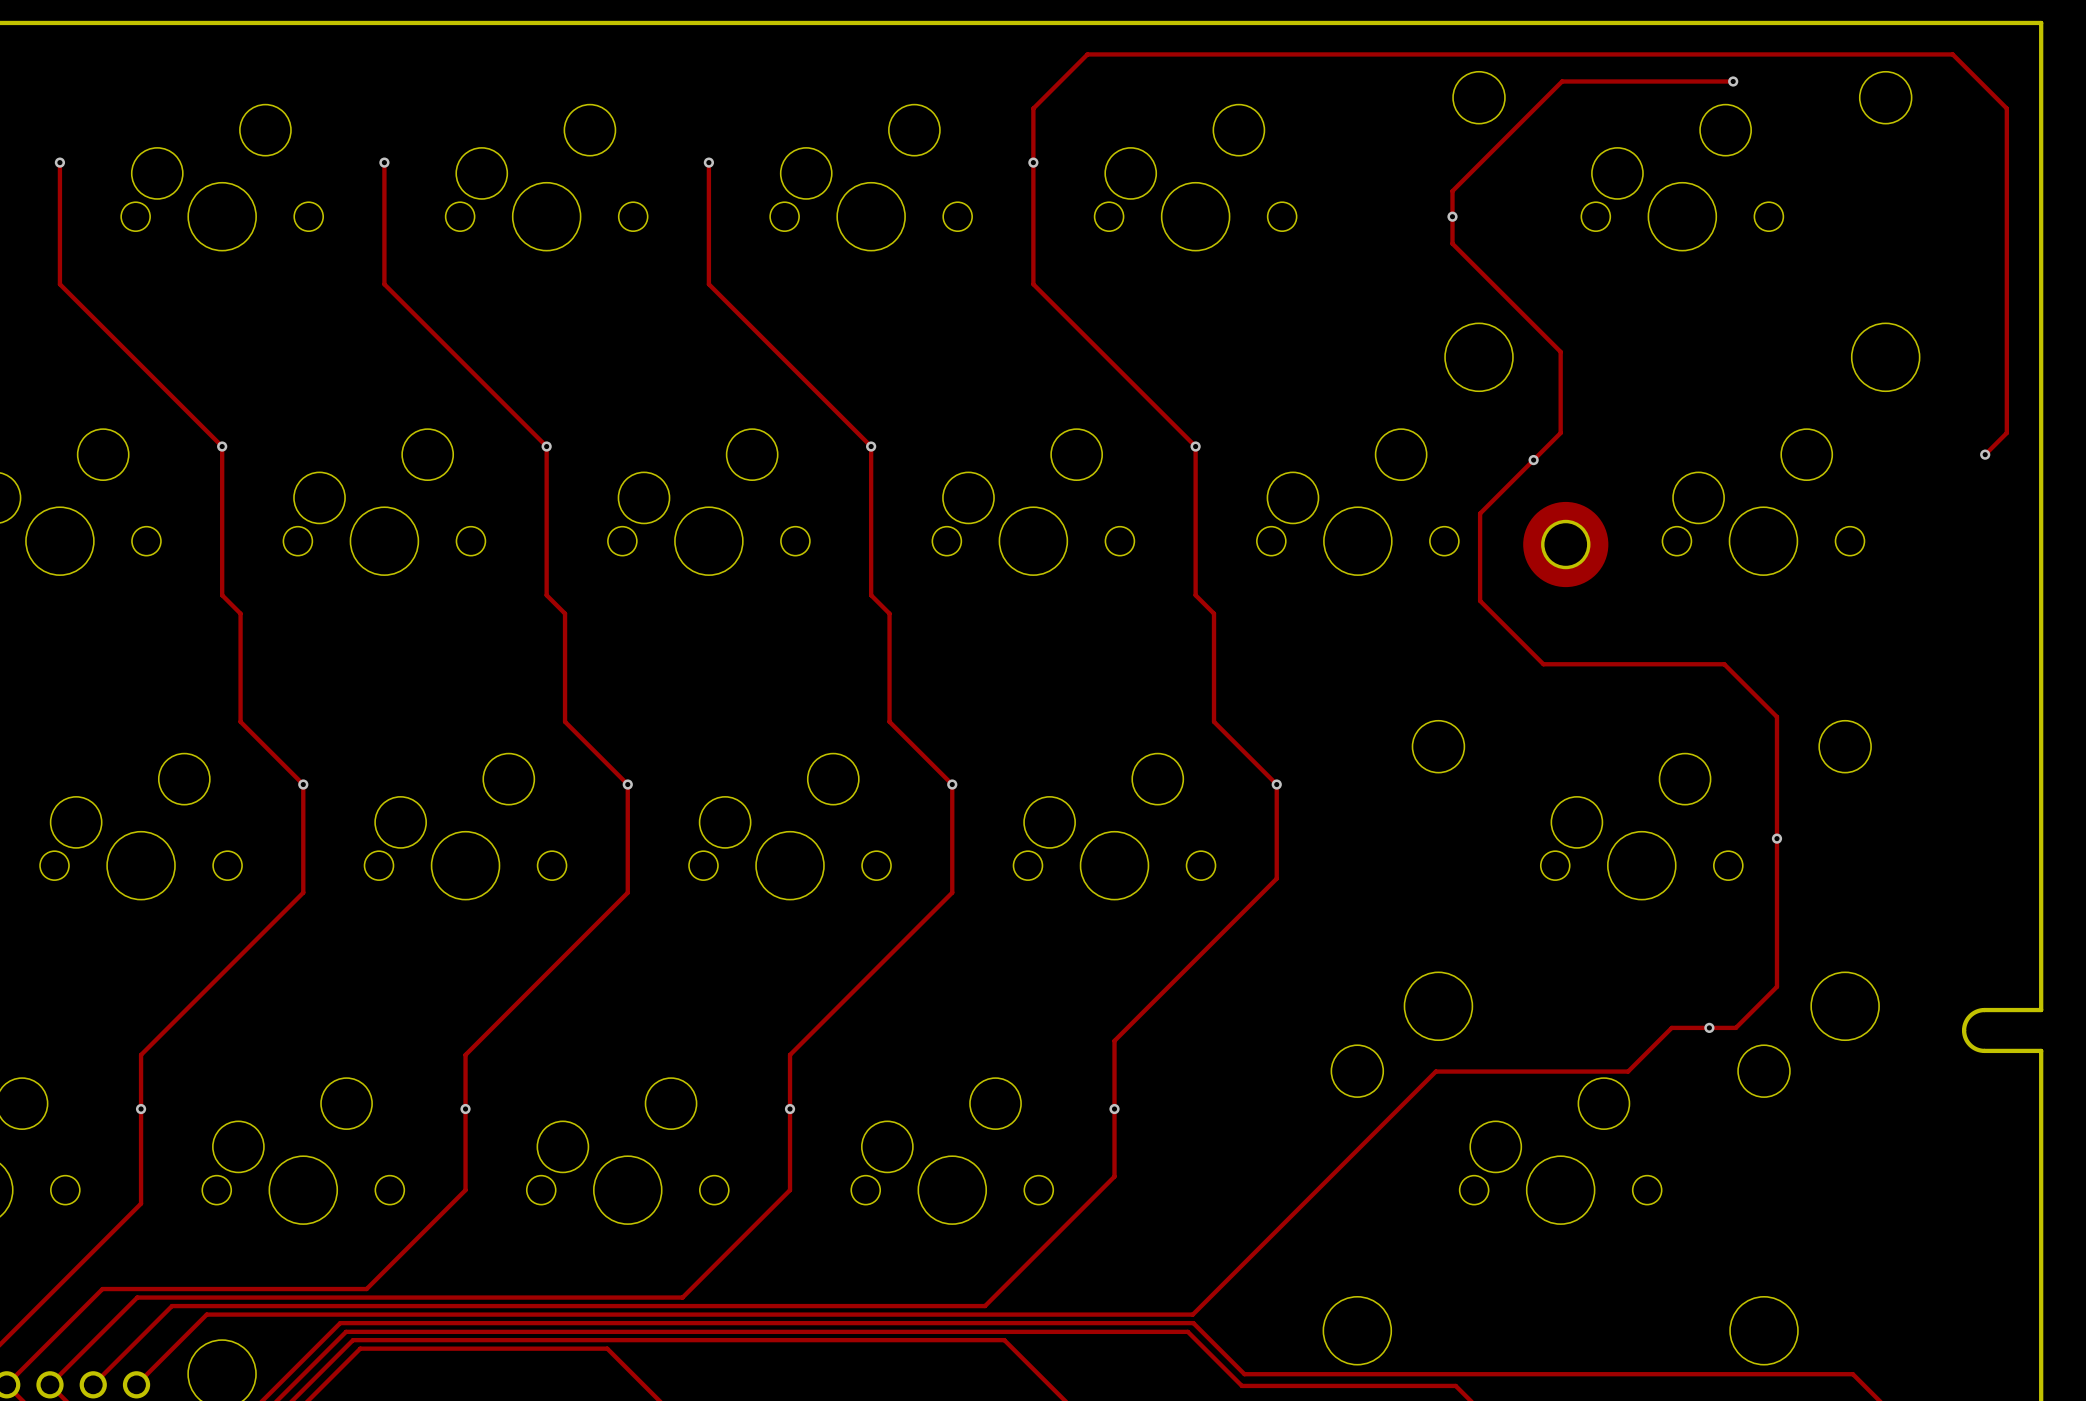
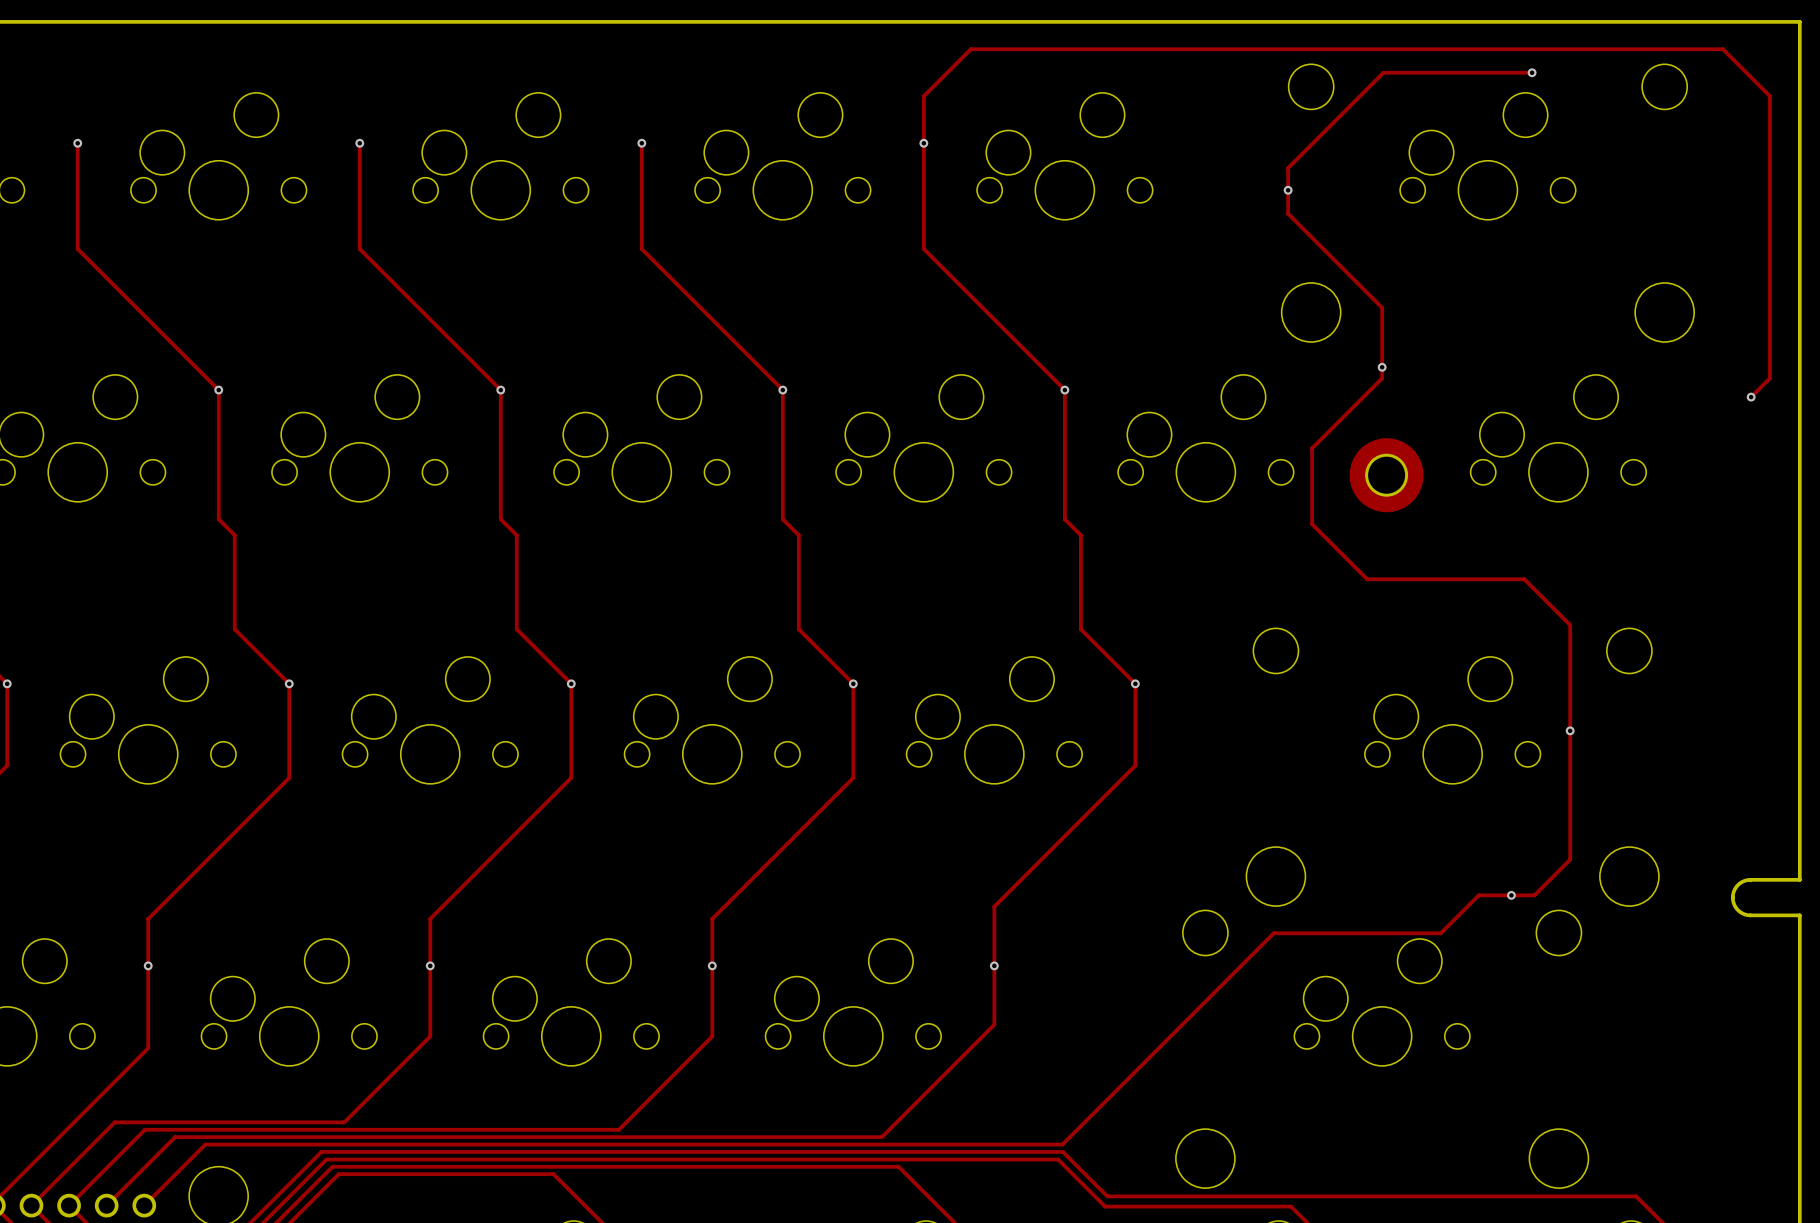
via position: (1533, 460) -> (1382, 367)

